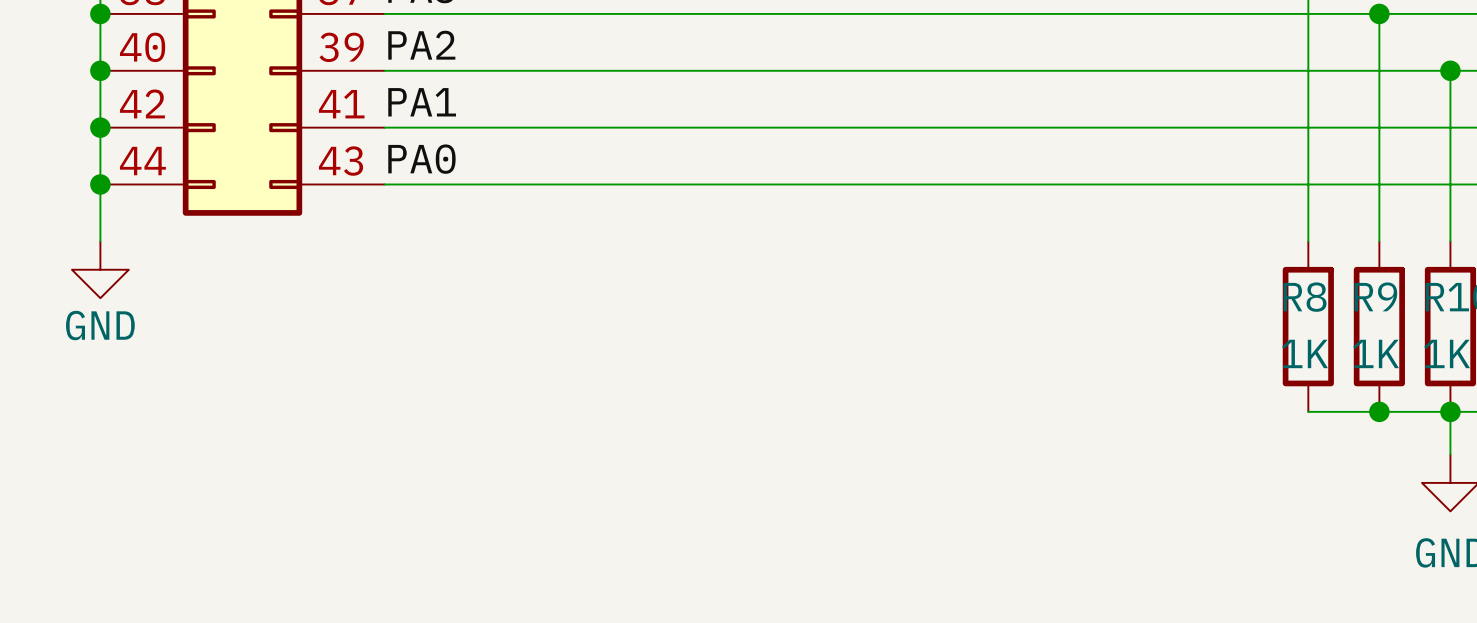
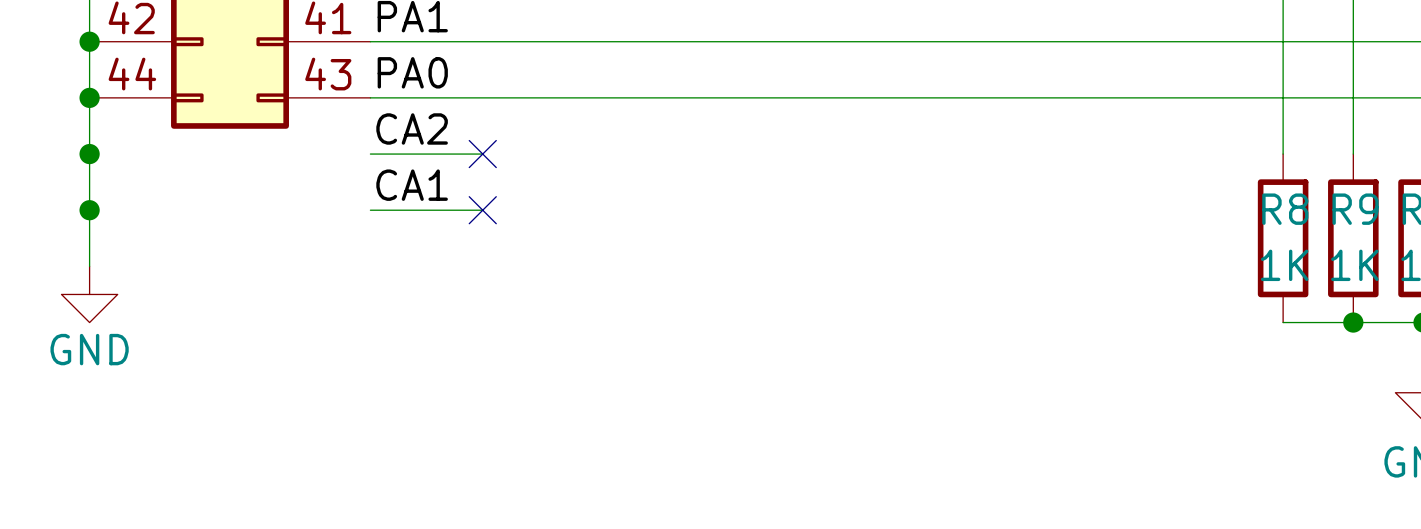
label: none -> CA2 (412, 128)
wire: none -> (89, 154) (89, 266)
junction: none -> (89, 154)
wire: none -> (370, 154) (482, 154)
no-connect mark: none -> (482, 154)
power symbol position: GND (100, 269) -> GND (89, 294)
label: none -> CA1 (412, 185)
junction: none -> (89, 210)
wire: none -> (370, 210) (482, 210)
no-connect mark: none -> (482, 210)

